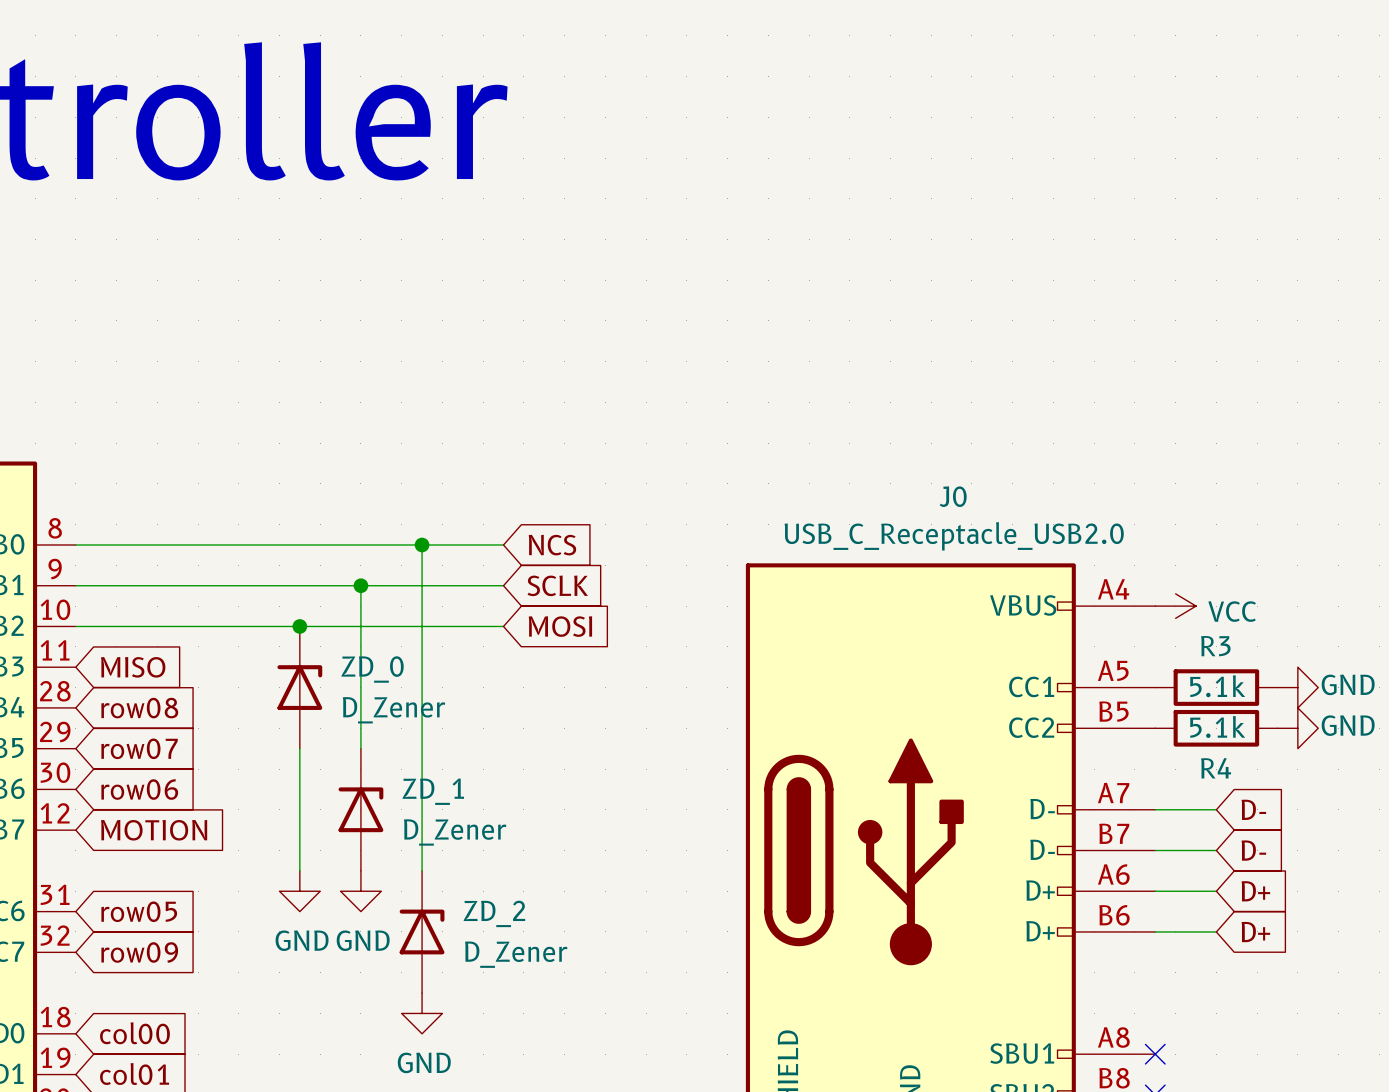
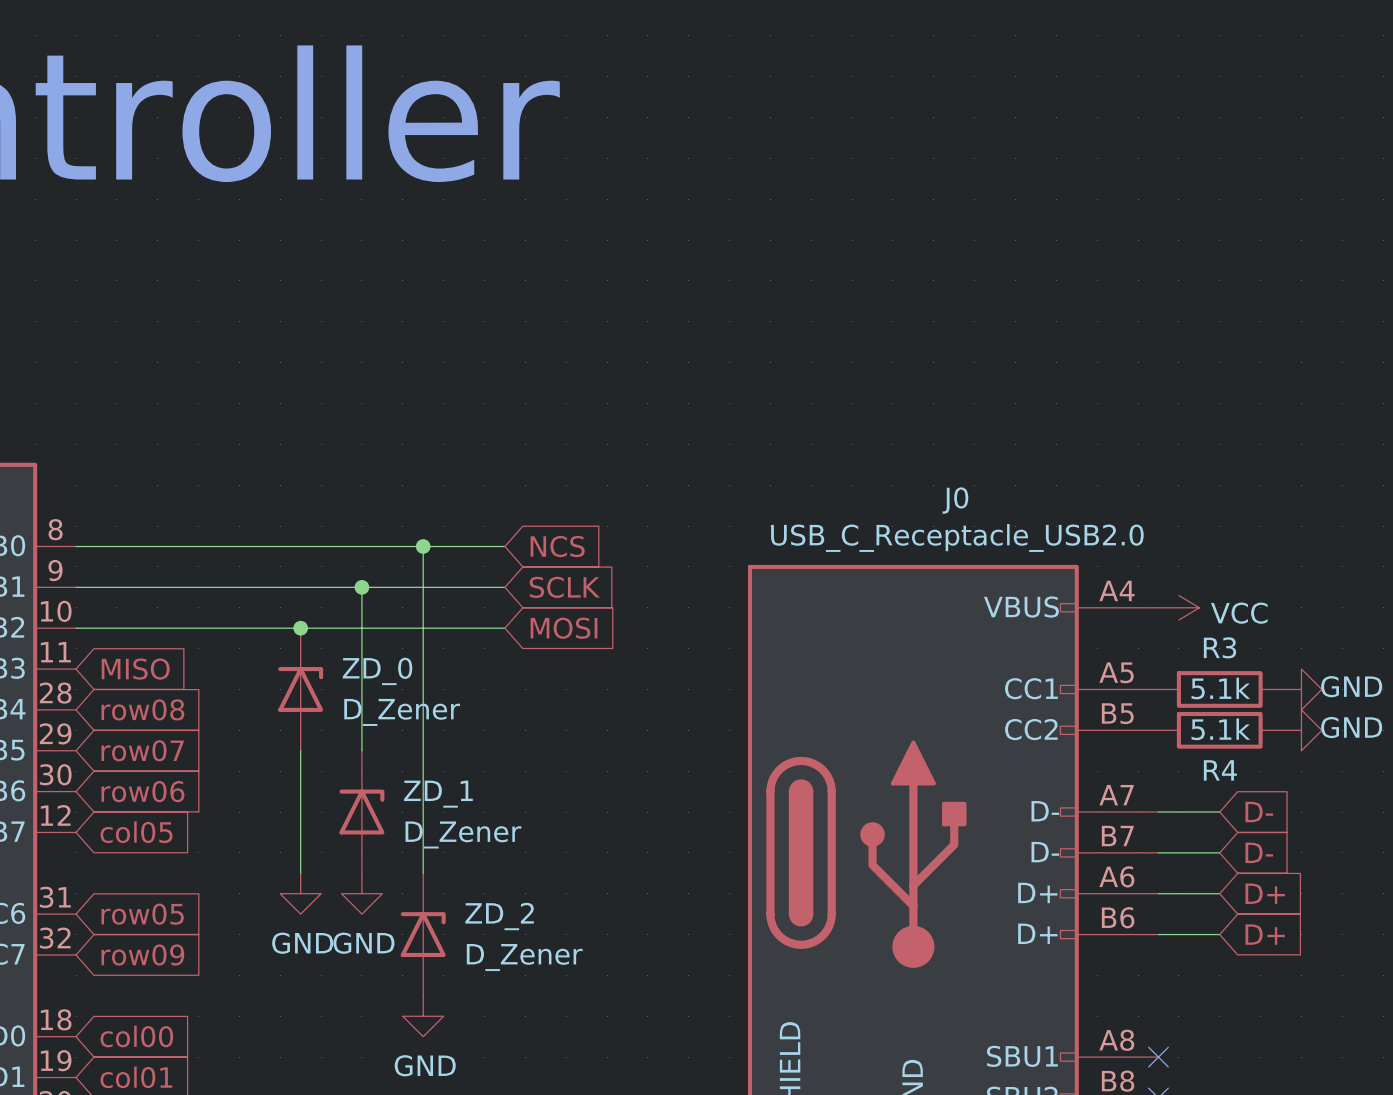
global label: MOTION (154, 830) -> col05 (136, 832)

